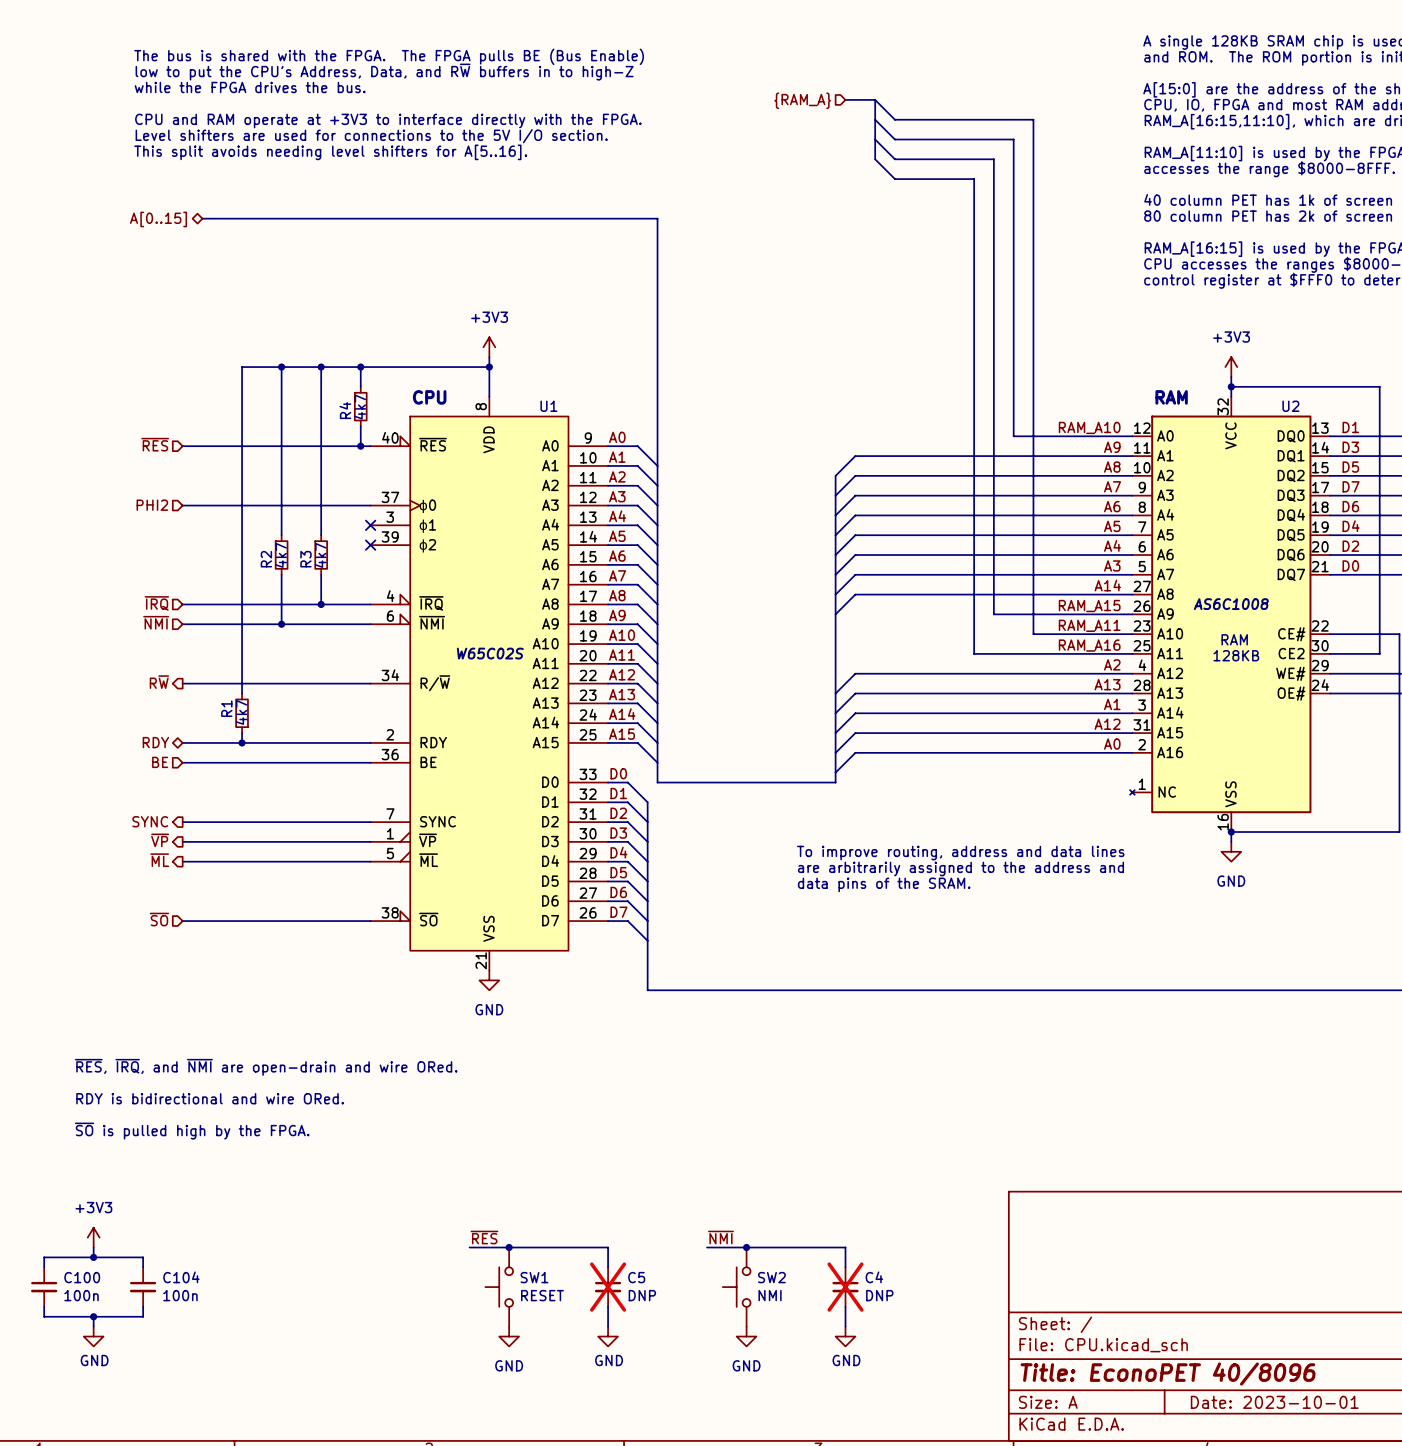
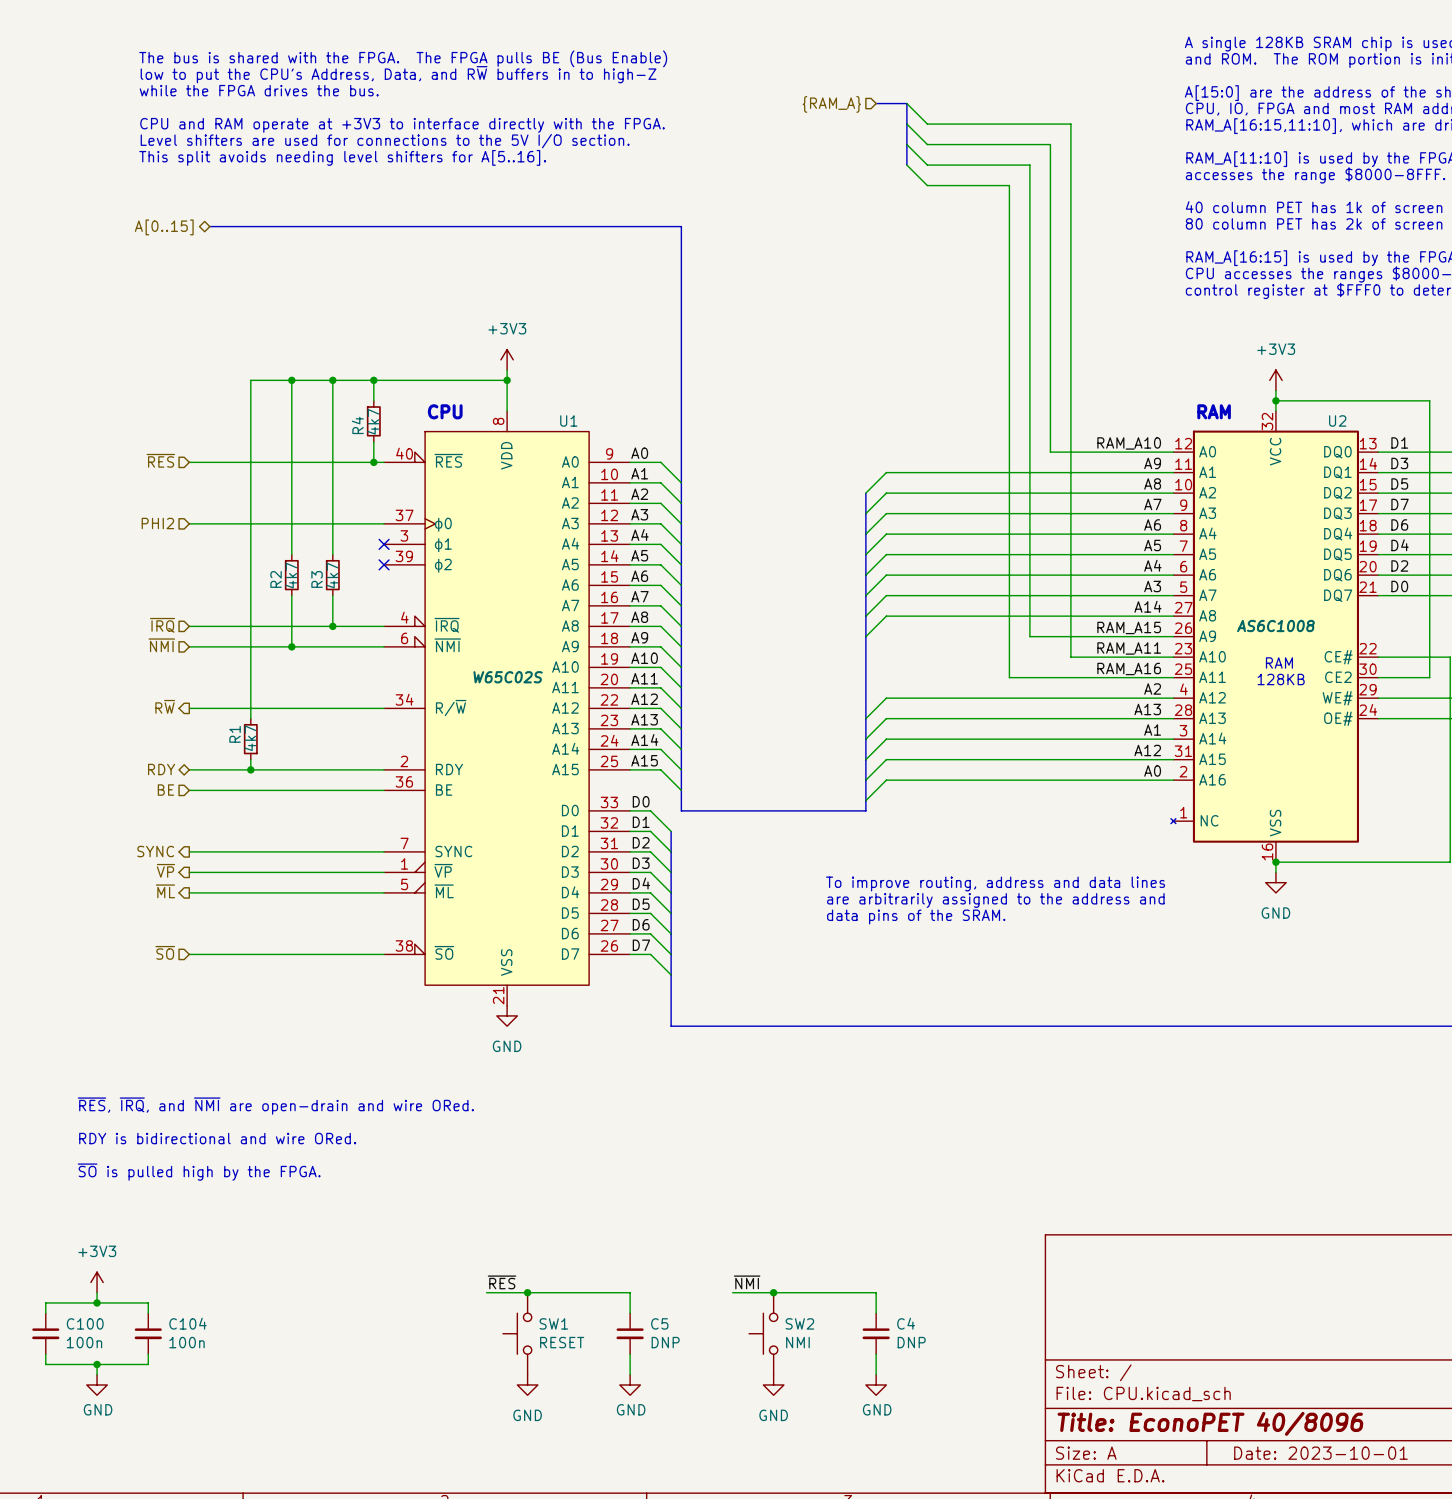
C5 do-not-place cross: (608, 1287) -> none
C4 do-not-place cross: (845, 1287) -> none

